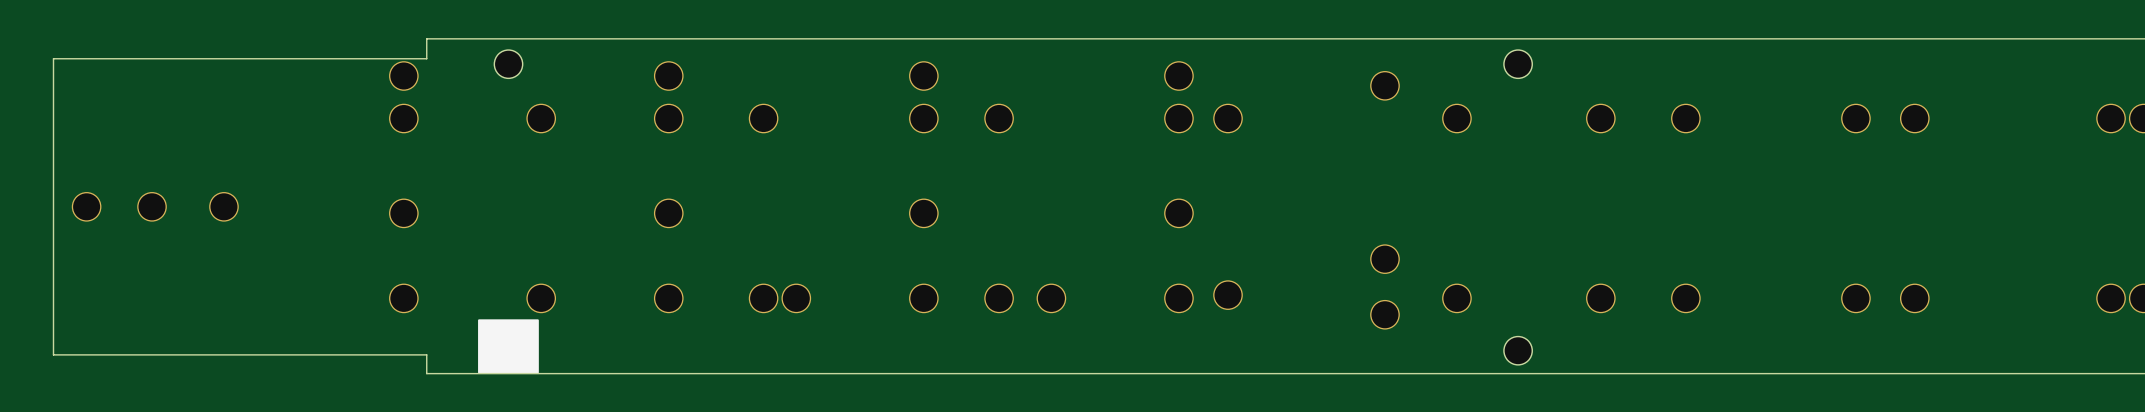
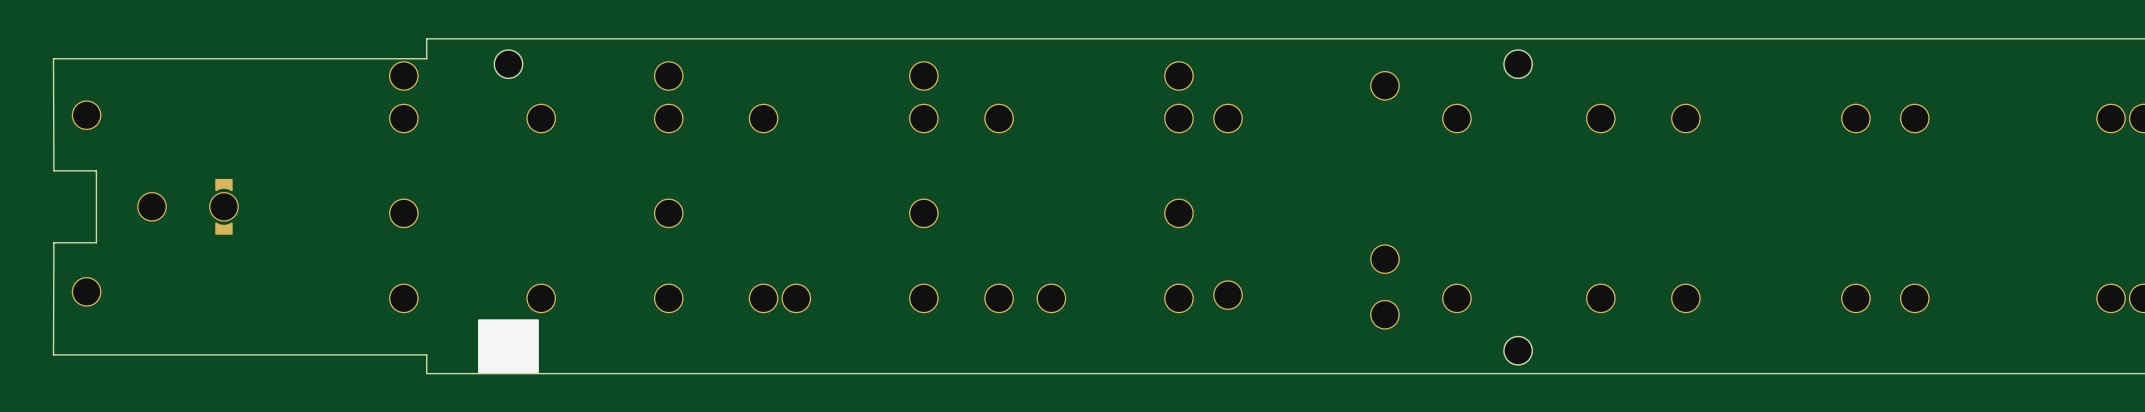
board edge: (53, 58) (53, 354) -> (53, 58) (53, 170) (96, 170) (96, 242) (53, 242) (53, 354)
part: none -> (86, 115)
part footprint: [209, 192, 239, 222] -> [209, 178, 239, 235]
part: (86, 206) -> none
part: none -> (86, 291)

